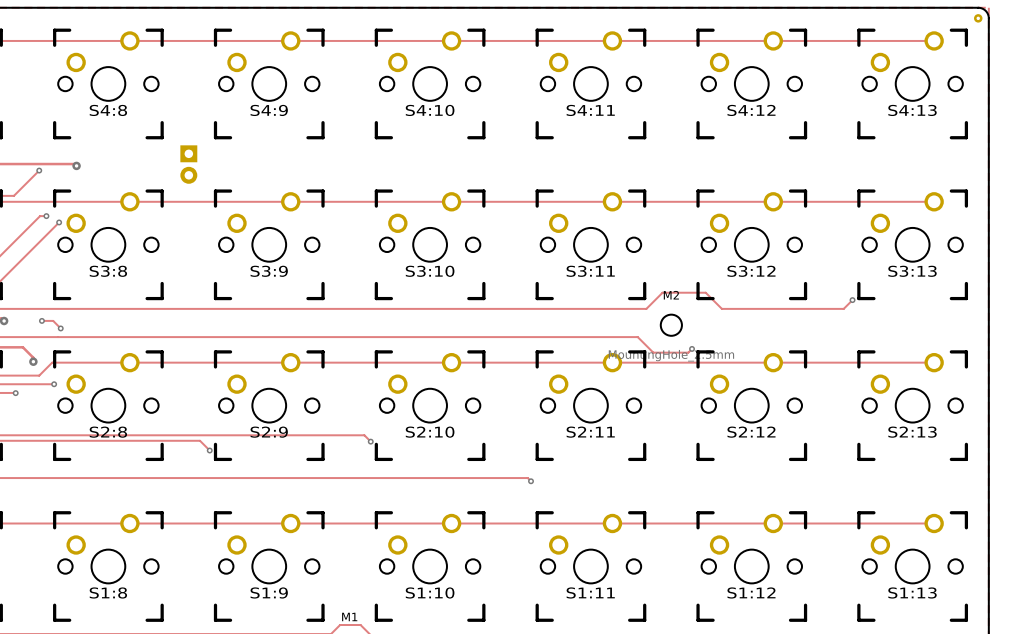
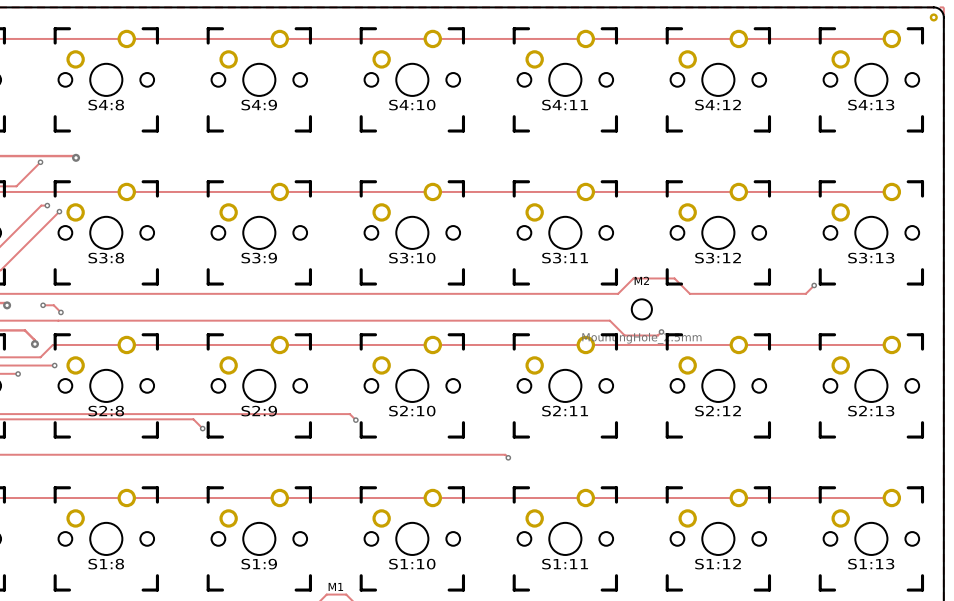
part: (188, 164) -> none

